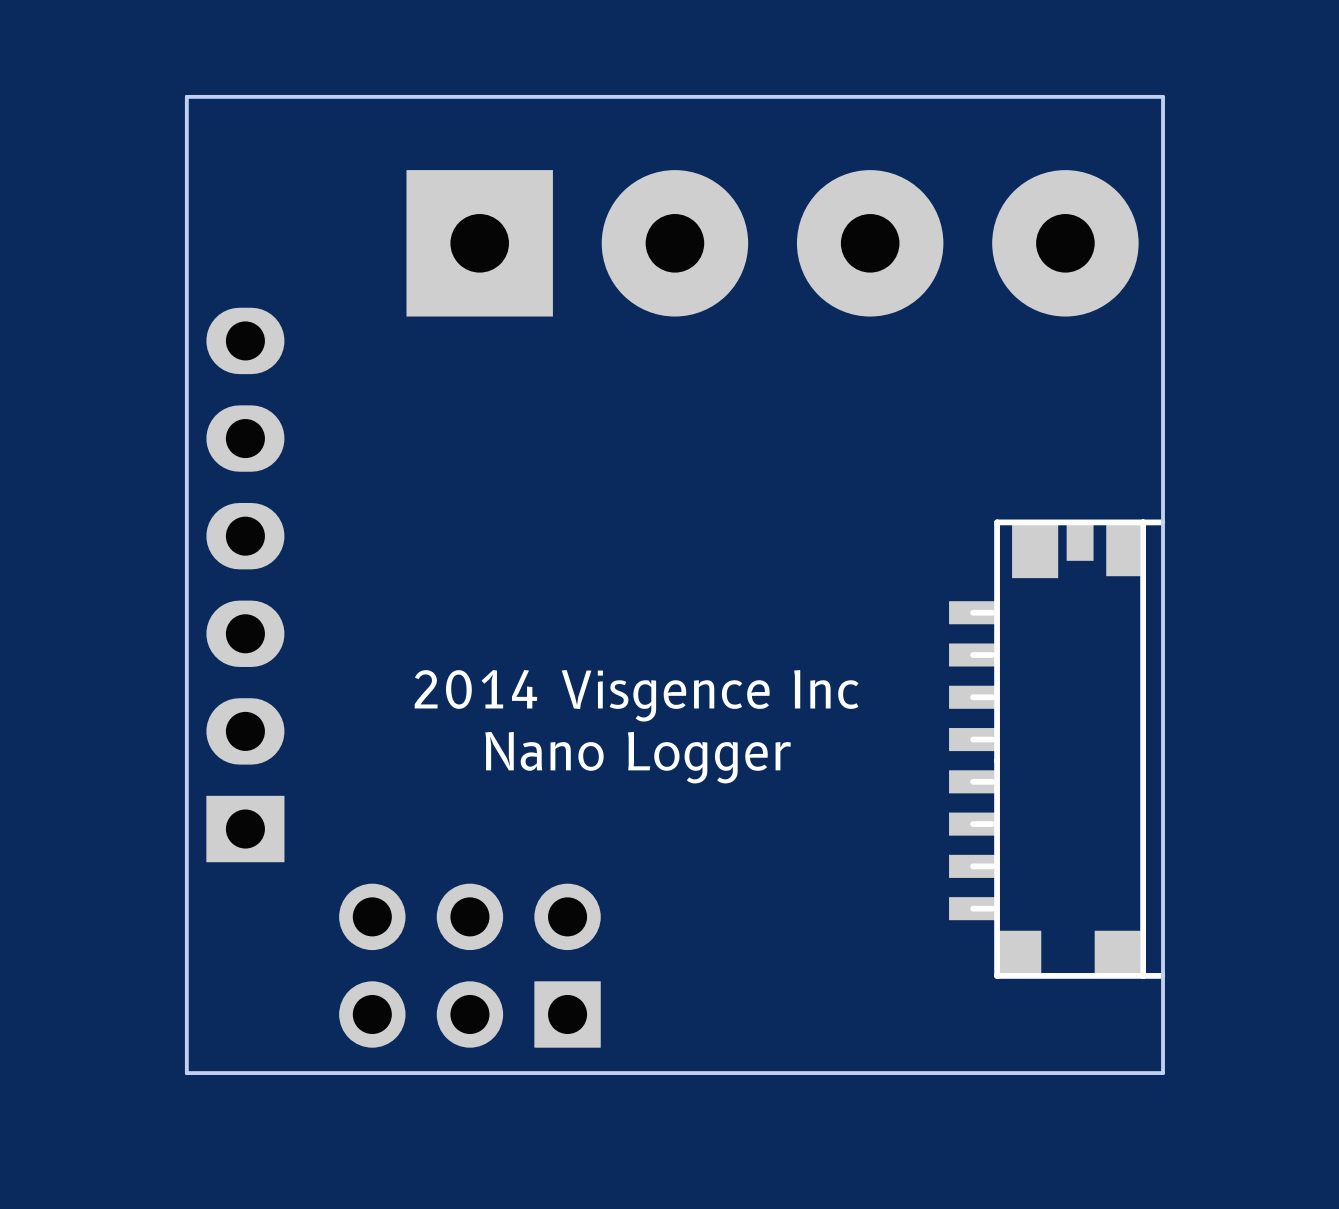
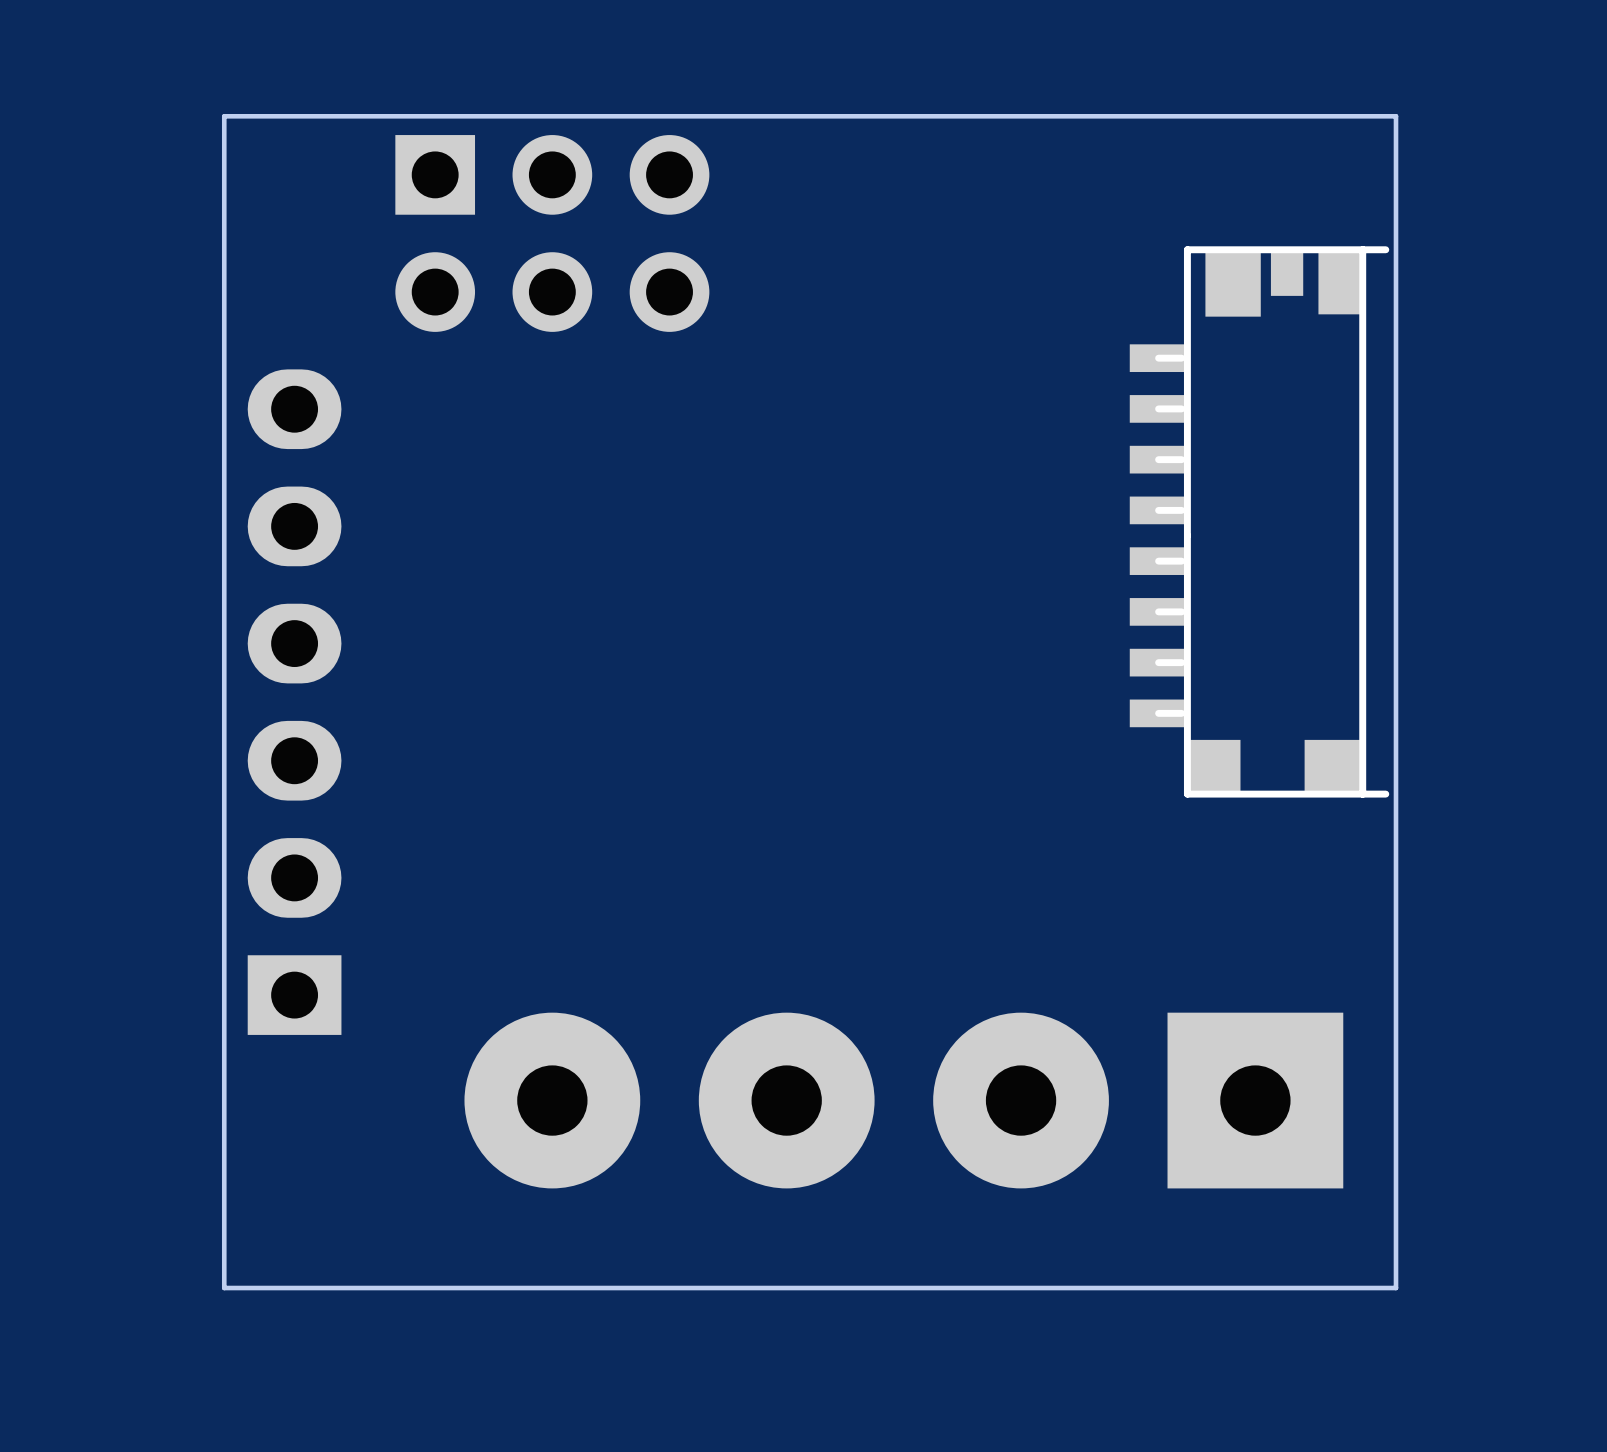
part rotation: 0° (772, 243) -> 180° (903, 1100)
part position: (772, 243) -> (903, 1100)
text: 2014 Visgence Inc (636, 695) -> none
part position: (1057, 749) -> (1259, 521)
text: Nano Logger (638, 757) -> none
part rotation: 0° (469, 965) -> 180° (552, 233)
part position: (469, 965) -> (552, 233)

